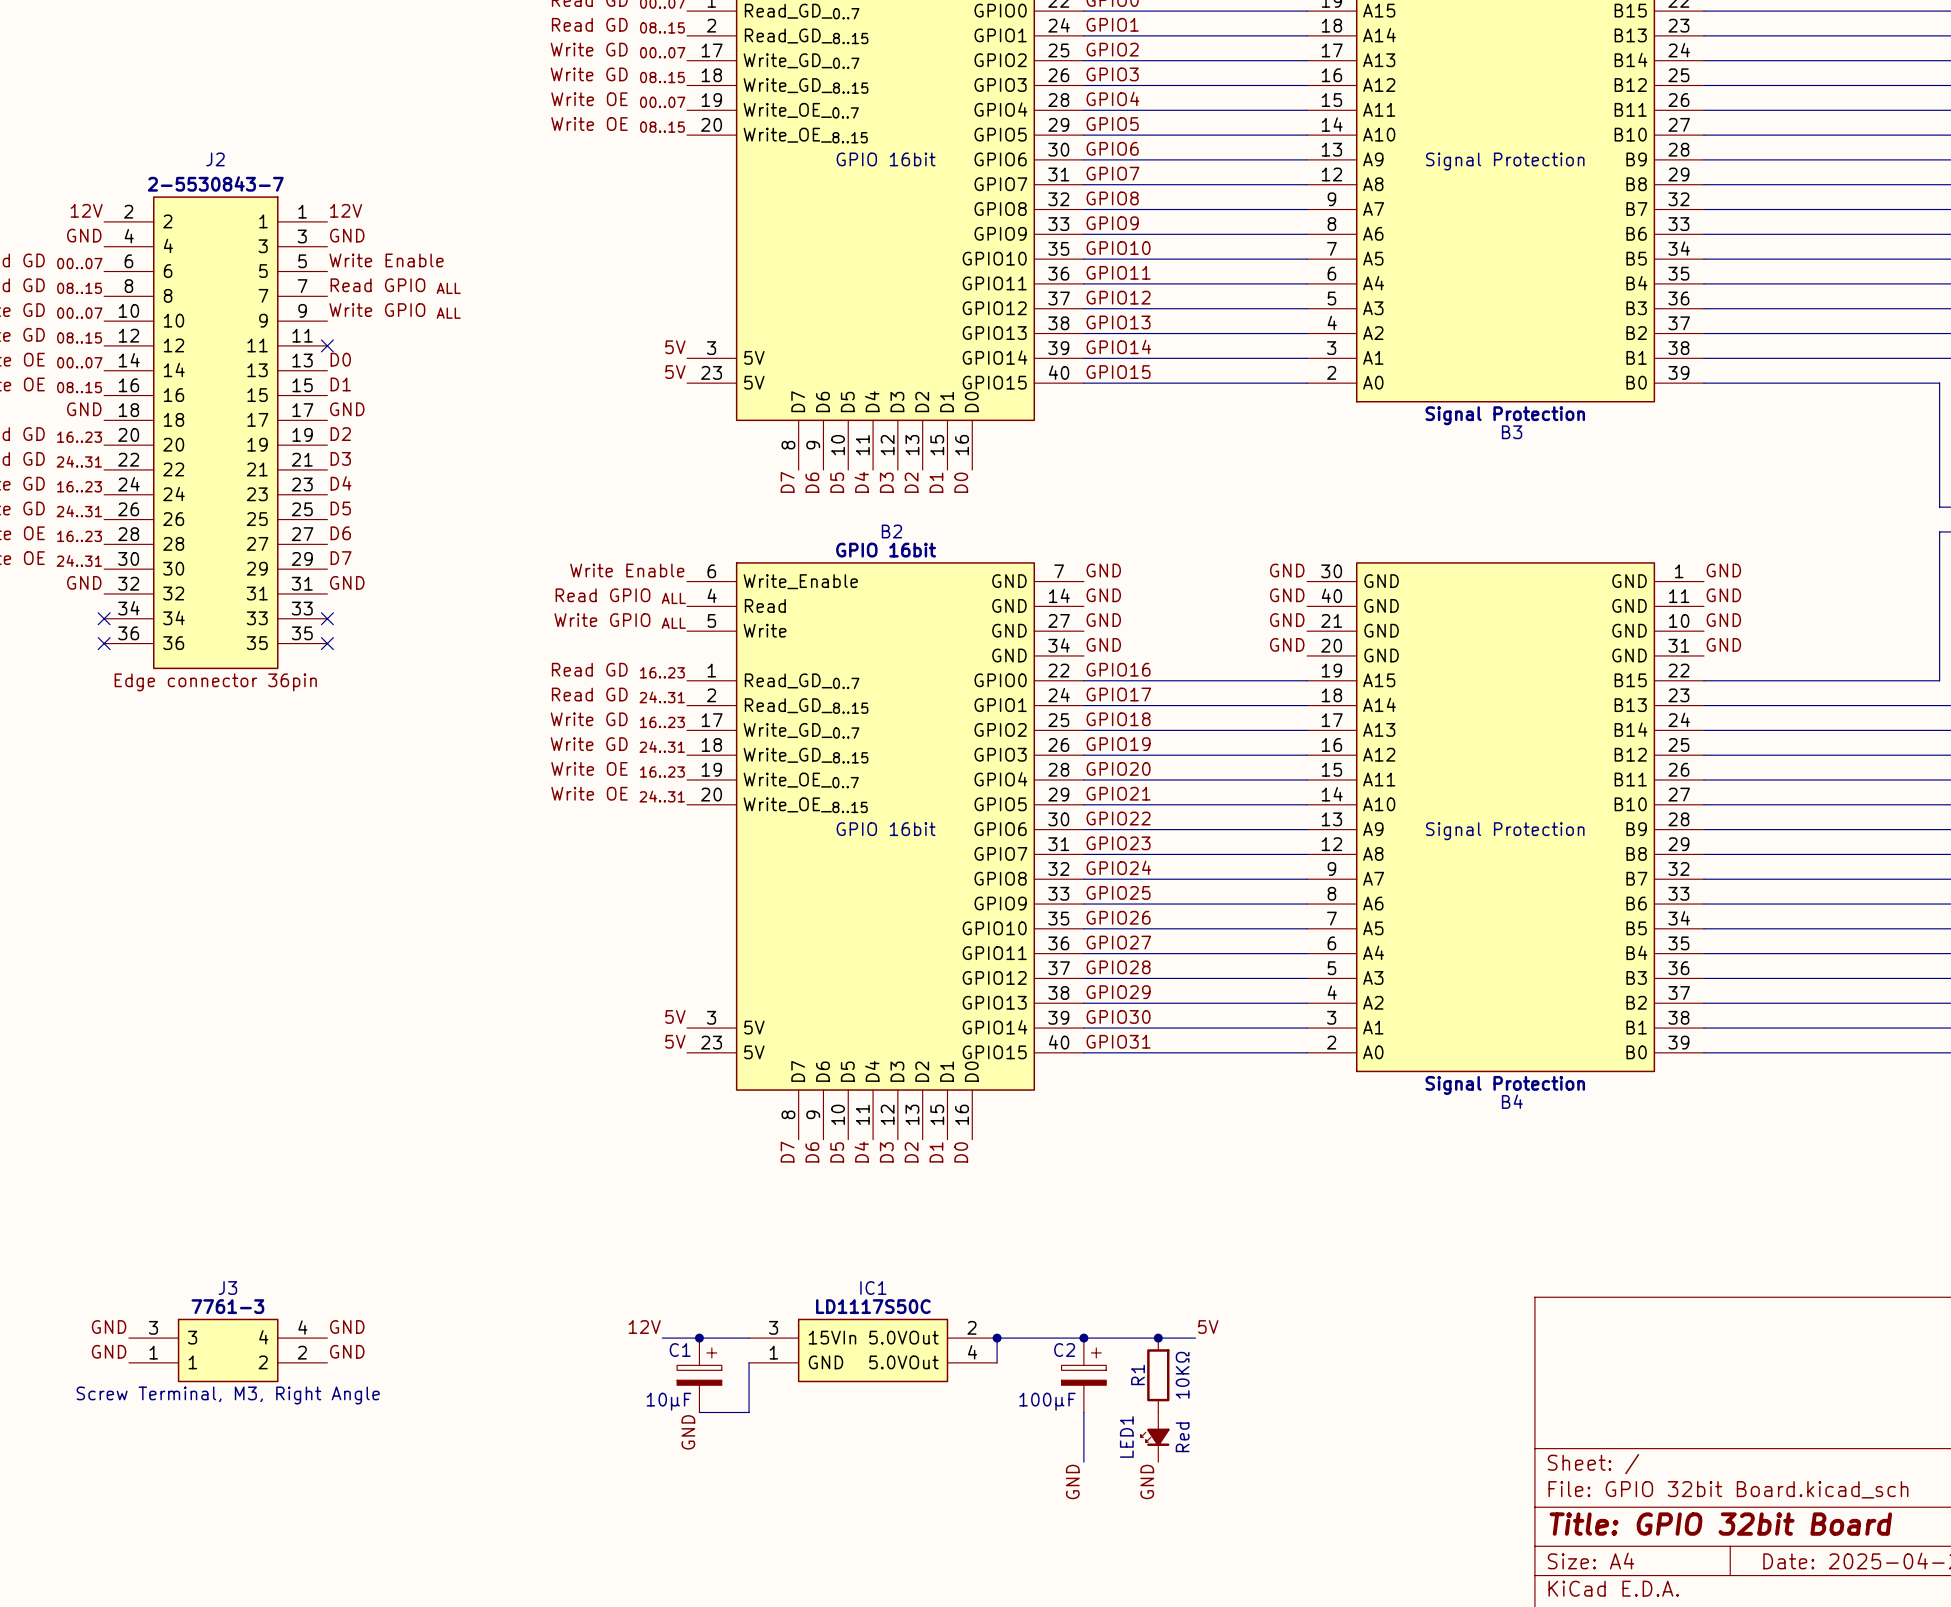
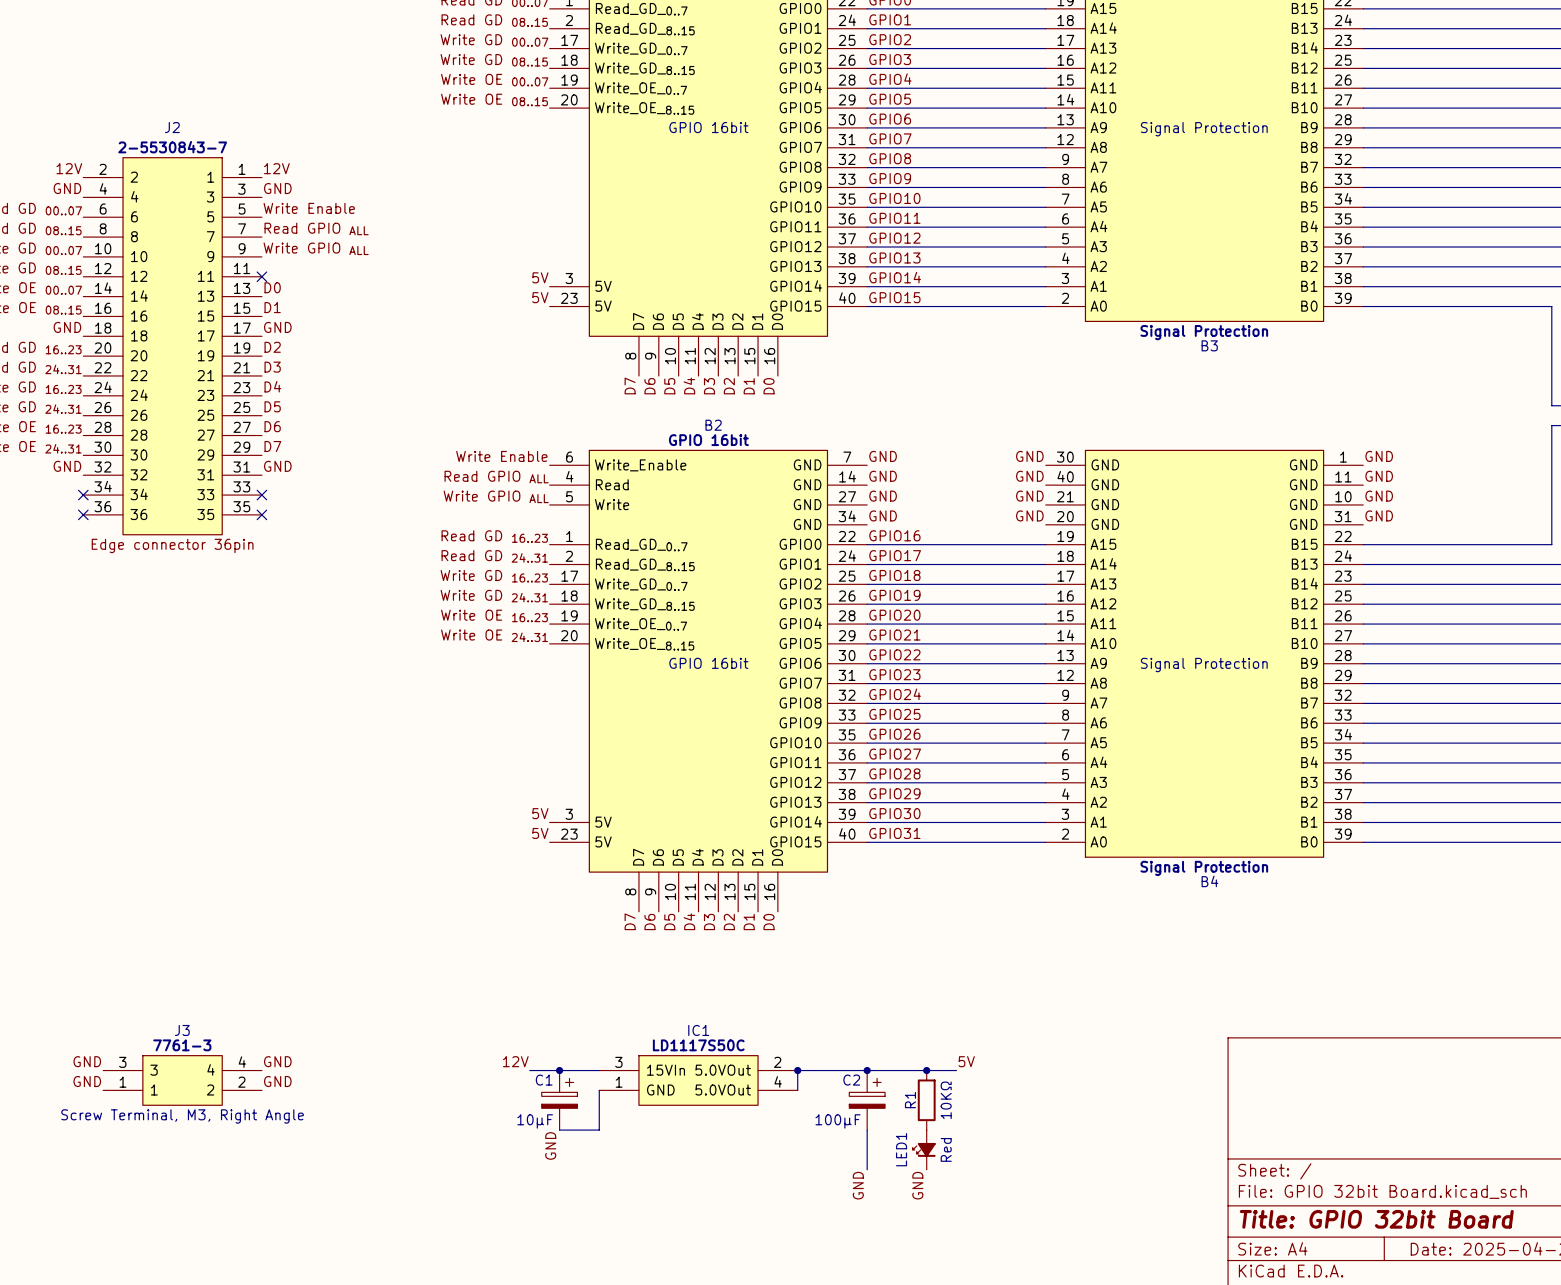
B3 pin number: 23 (1678, 25) -> 24 (1343, 20)
B3 pin number: 24 (1679, 50) -> 23 (1343, 40)
B4 pin number: 23 (1678, 695) -> 24 (1343, 556)
B4 pin number: 24 (1679, 719) -> 23 (1343, 576)

